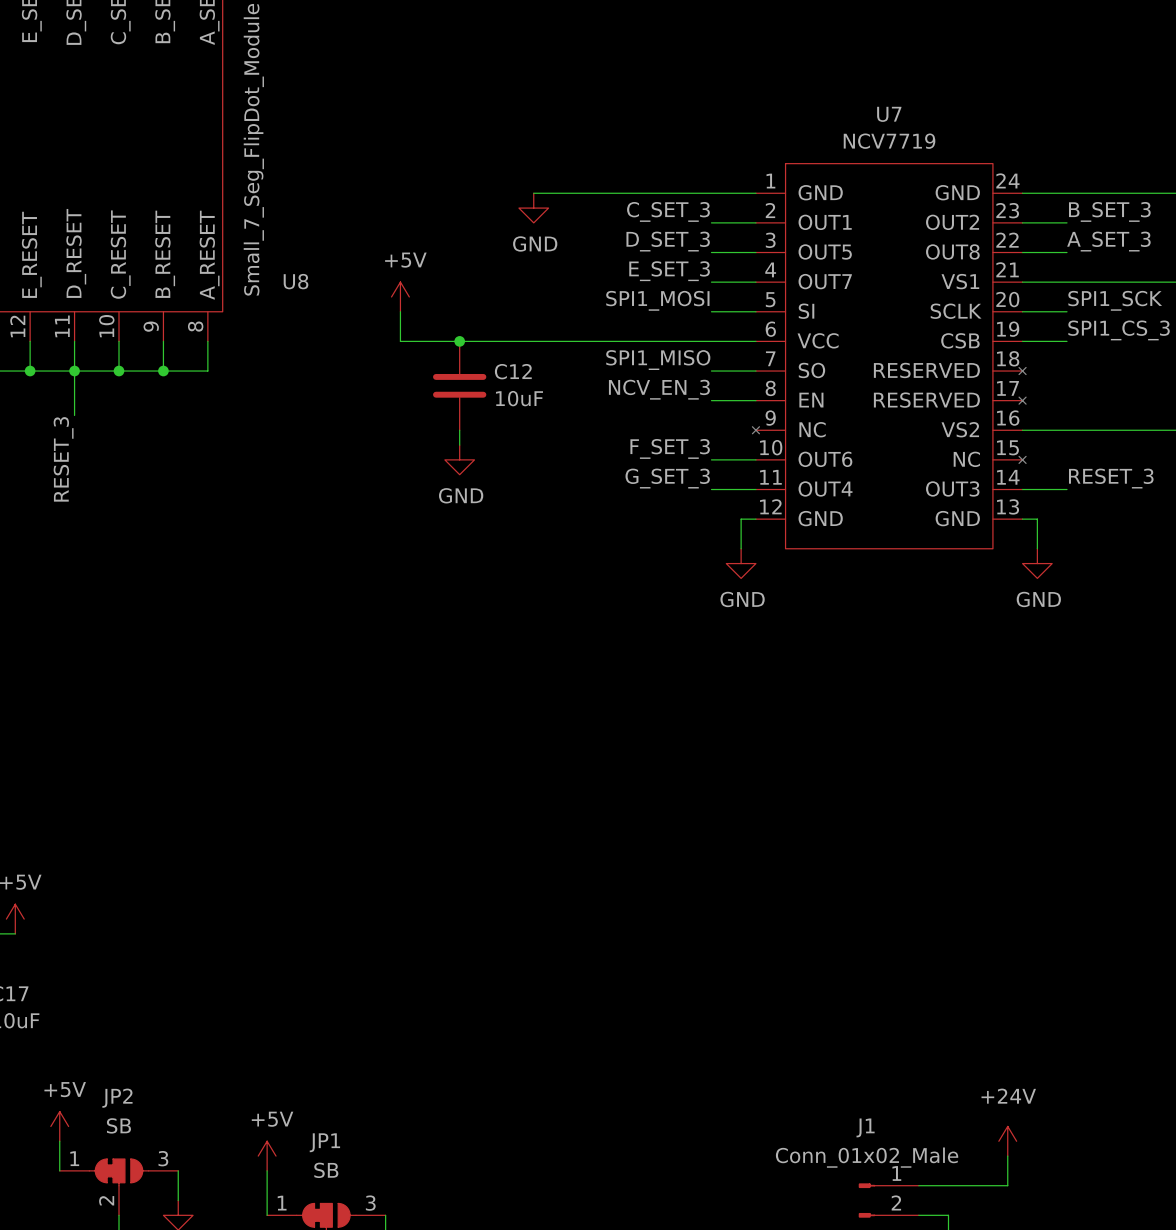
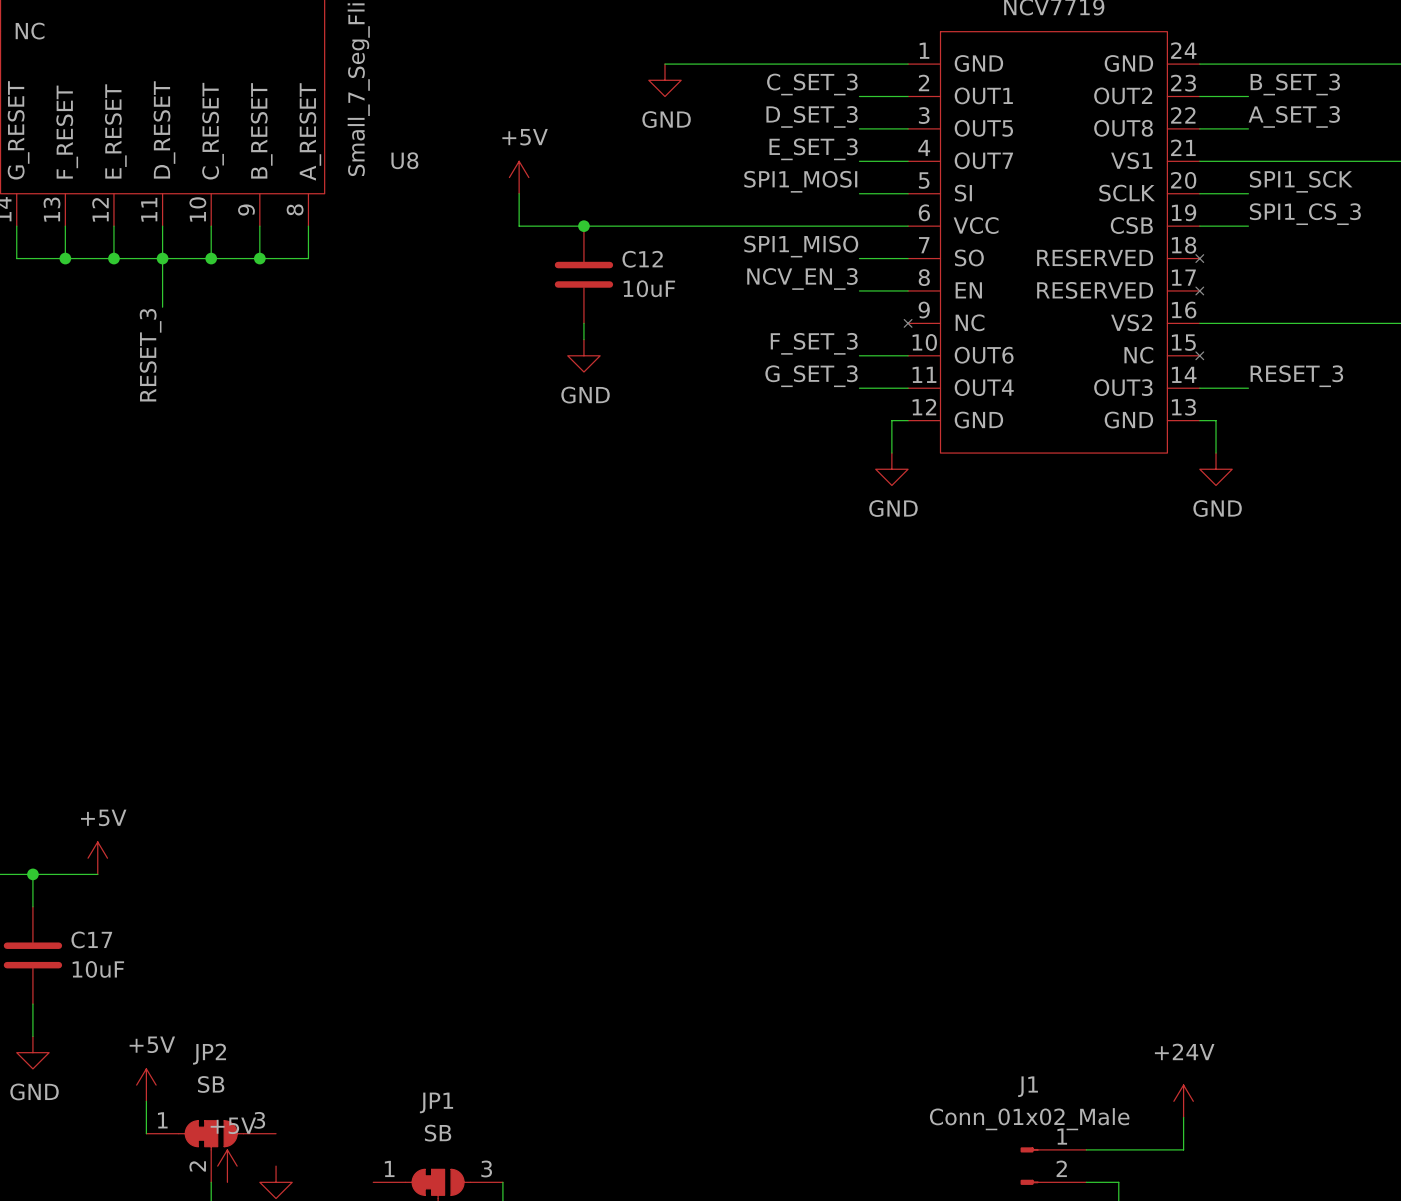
power symbol position: +5V (267, 1156) -> +5V (227, 1166)
wire: (178, 1170) (178, 1200) -> none
wire: (267, 1170) (267, 1215) -> none

